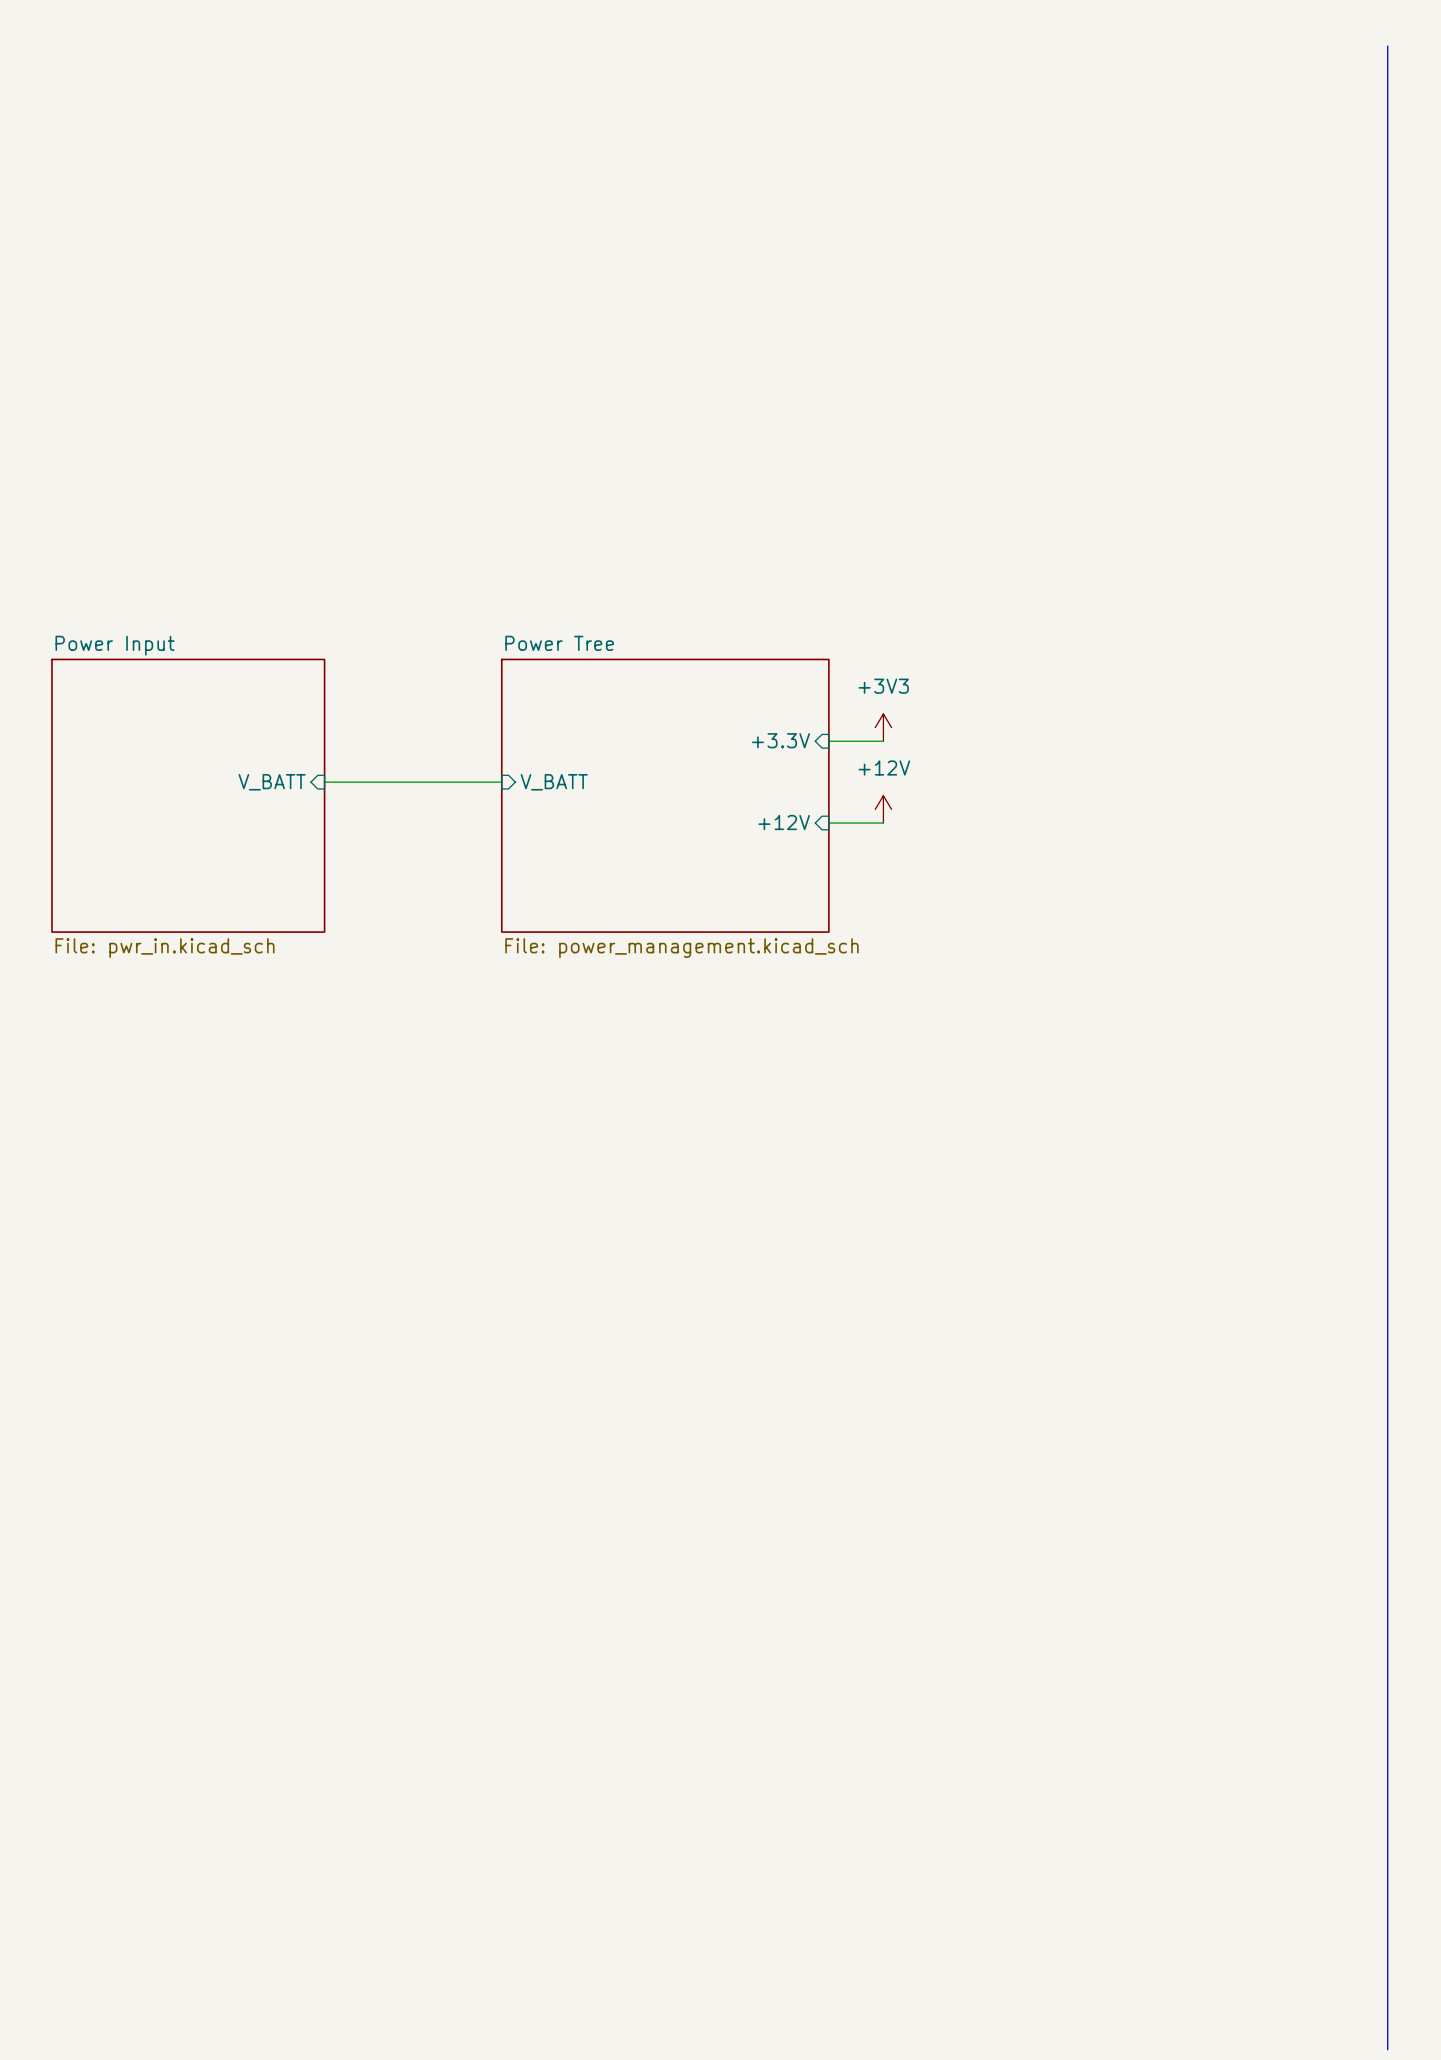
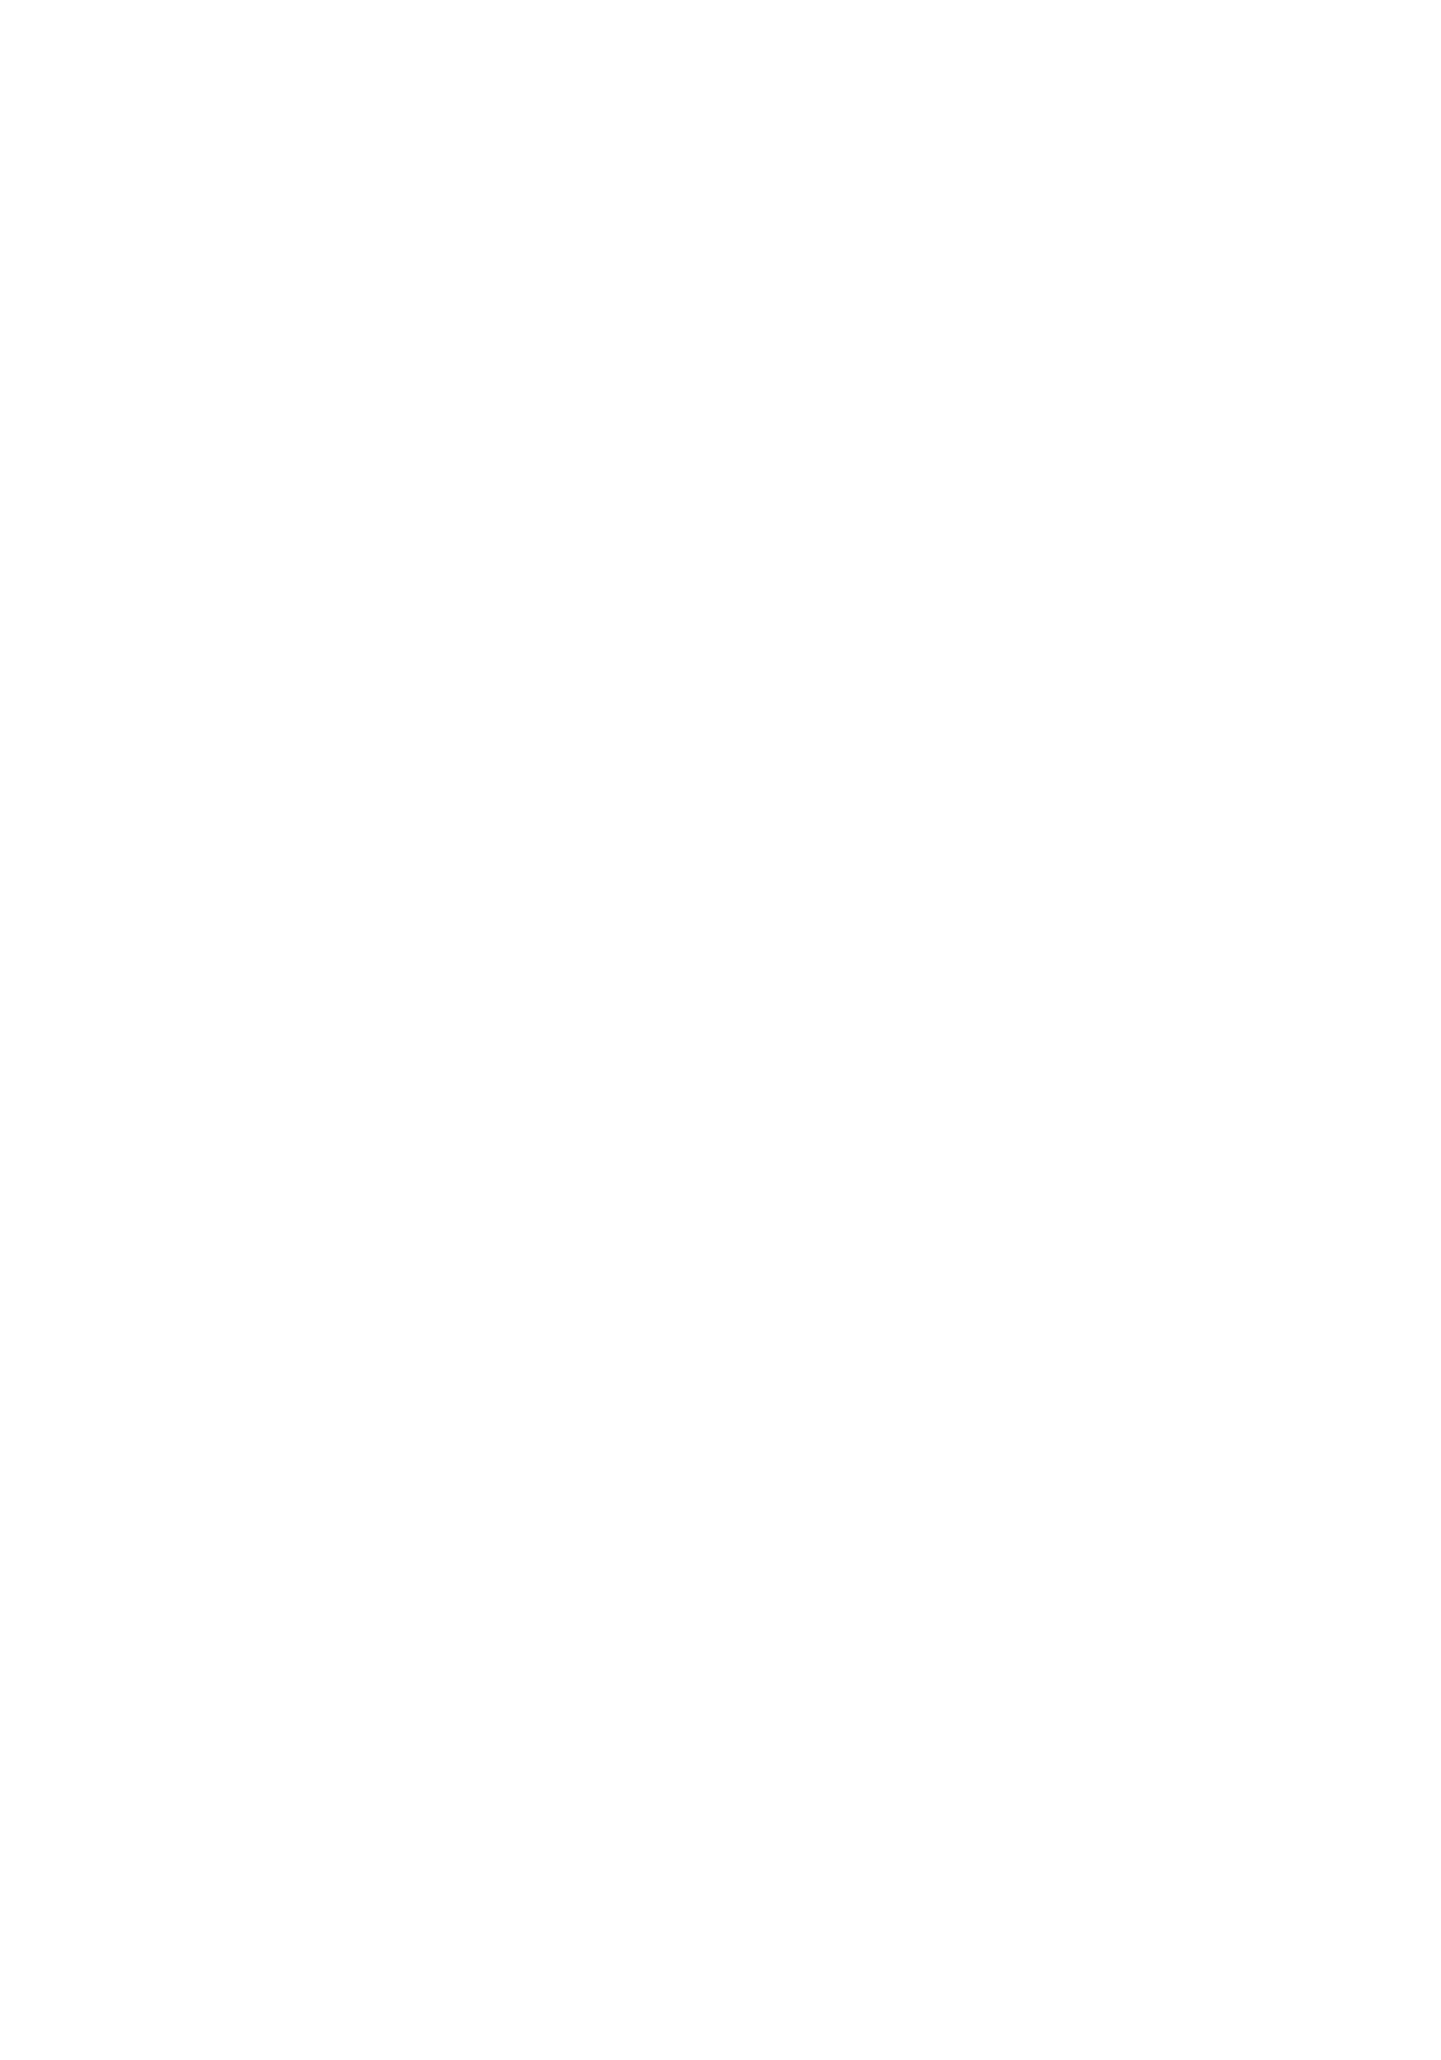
bus: (1387, 46) (1387, 2049) -> none
power symbol: +3V3 (883, 727) -> none
sheet pin: +3.3V (780, 740) -> none
wire: (828, 741) (883, 741) -> none
sheet pin: V_BATT (272, 782) -> none
wire: (324, 782) (501, 782) -> none
sheet pin: V_BATT (554, 782) -> none
sheet Power Input: File: pwr_in.kicad_sch (188, 795) -> none
sheet Power Tree: File: power_management.kicad_sch (665, 795) -> none
power symbol: +12V (883, 809) -> none
sheet pin: +12V (784, 822) -> none
wire: (828, 823) (883, 823) -> none

